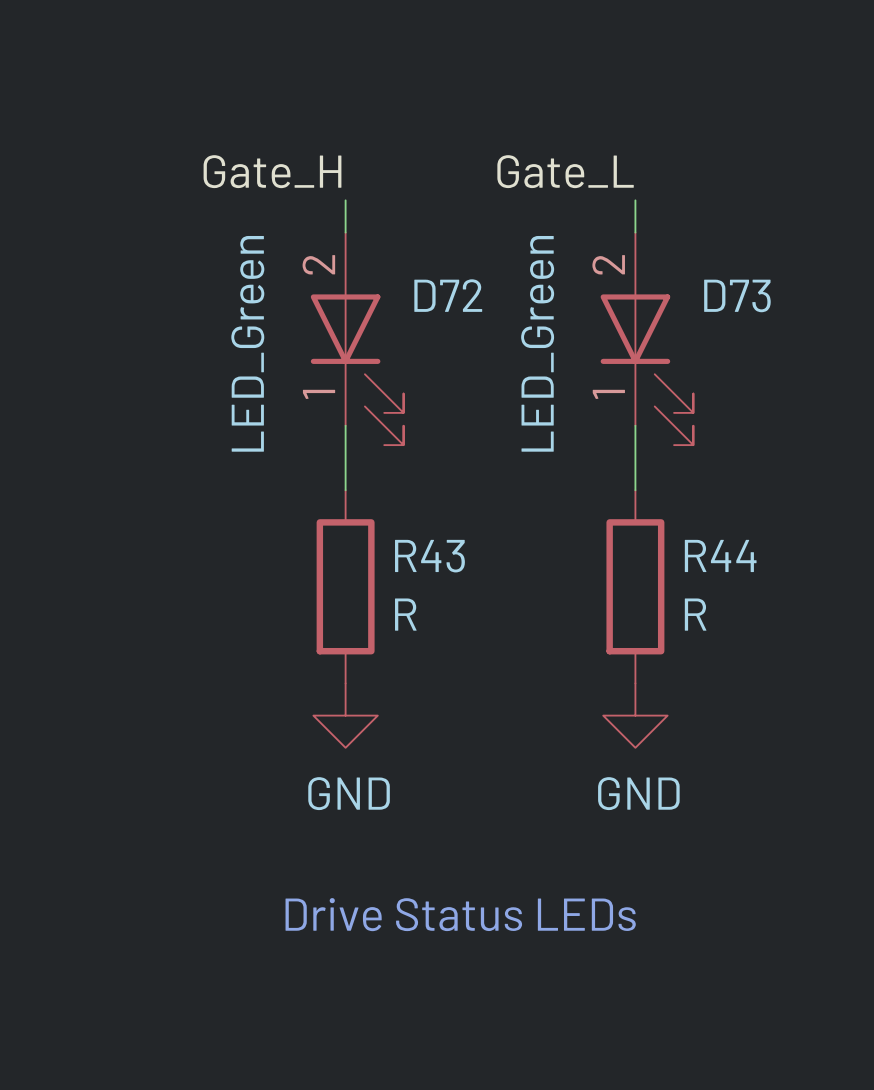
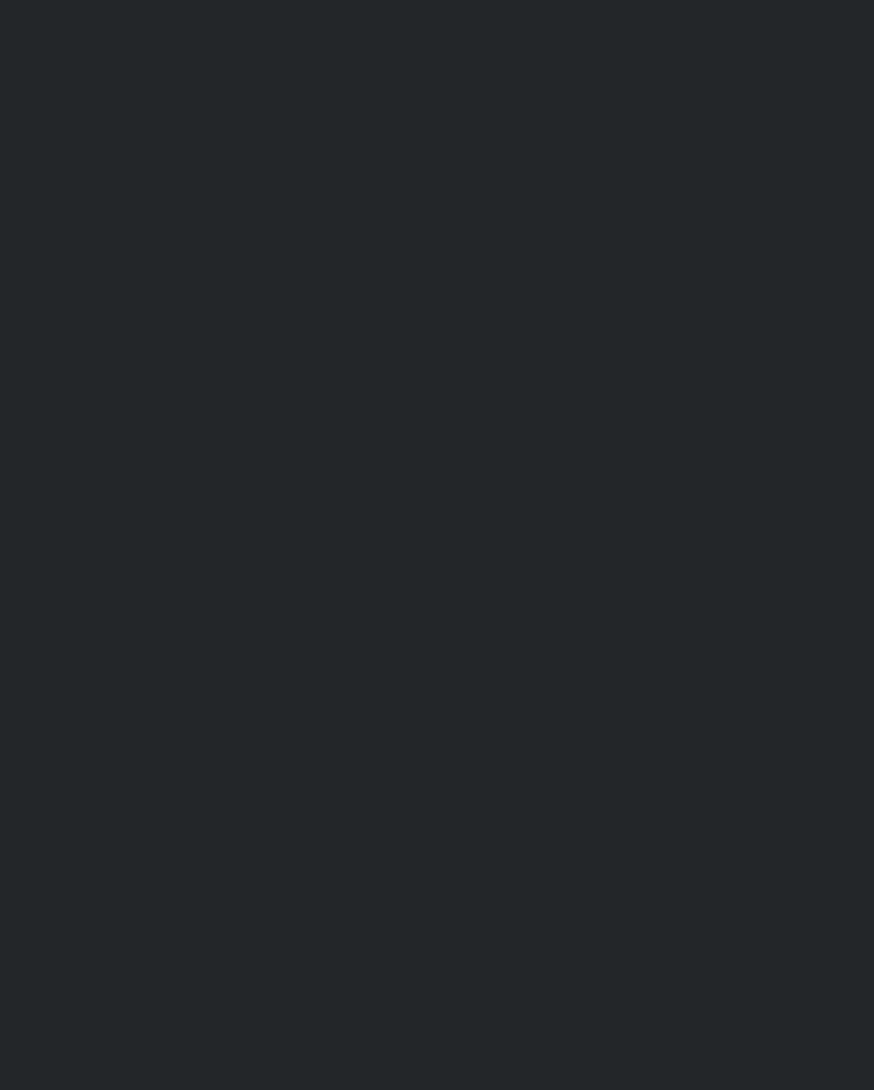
label: Gate_H (272, 171) -> none
label: Gate_L (565, 171) -> none
wire: (345, 200) (345, 232) -> none
wire: (635, 200) (635, 232) -> none
D72: LED_Green (357, 338) -> none
D73: LED_Green (647, 338) -> none
wire: (345, 425) (345, 490) -> none
wire: (635, 425) (635, 490) -> none
R43: R (345, 586) -> none
R44: R (635, 586) -> none
power symbol: GND (345, 715) -> none
power symbol: GND (635, 715) -> none
text: Drive Status LEDs (460, 914) -> none

